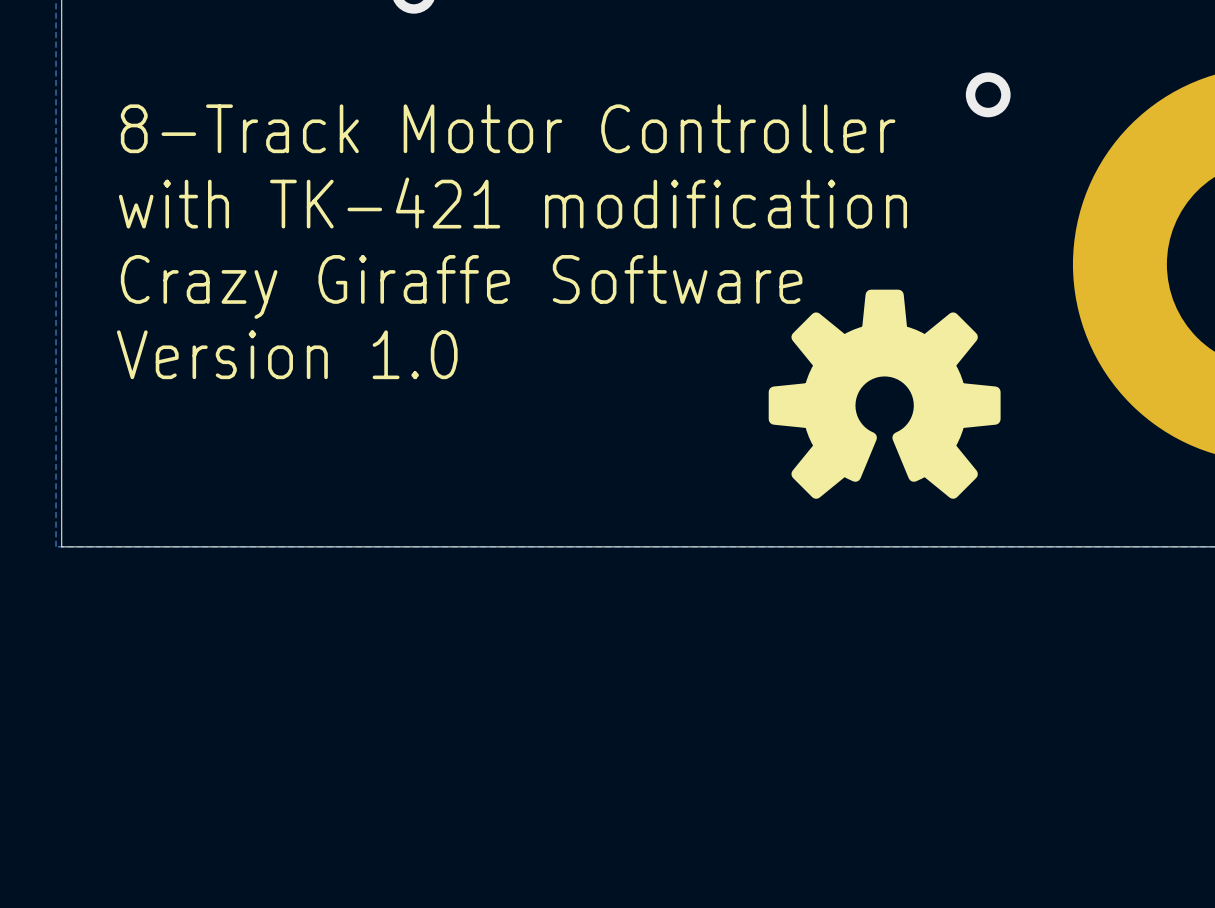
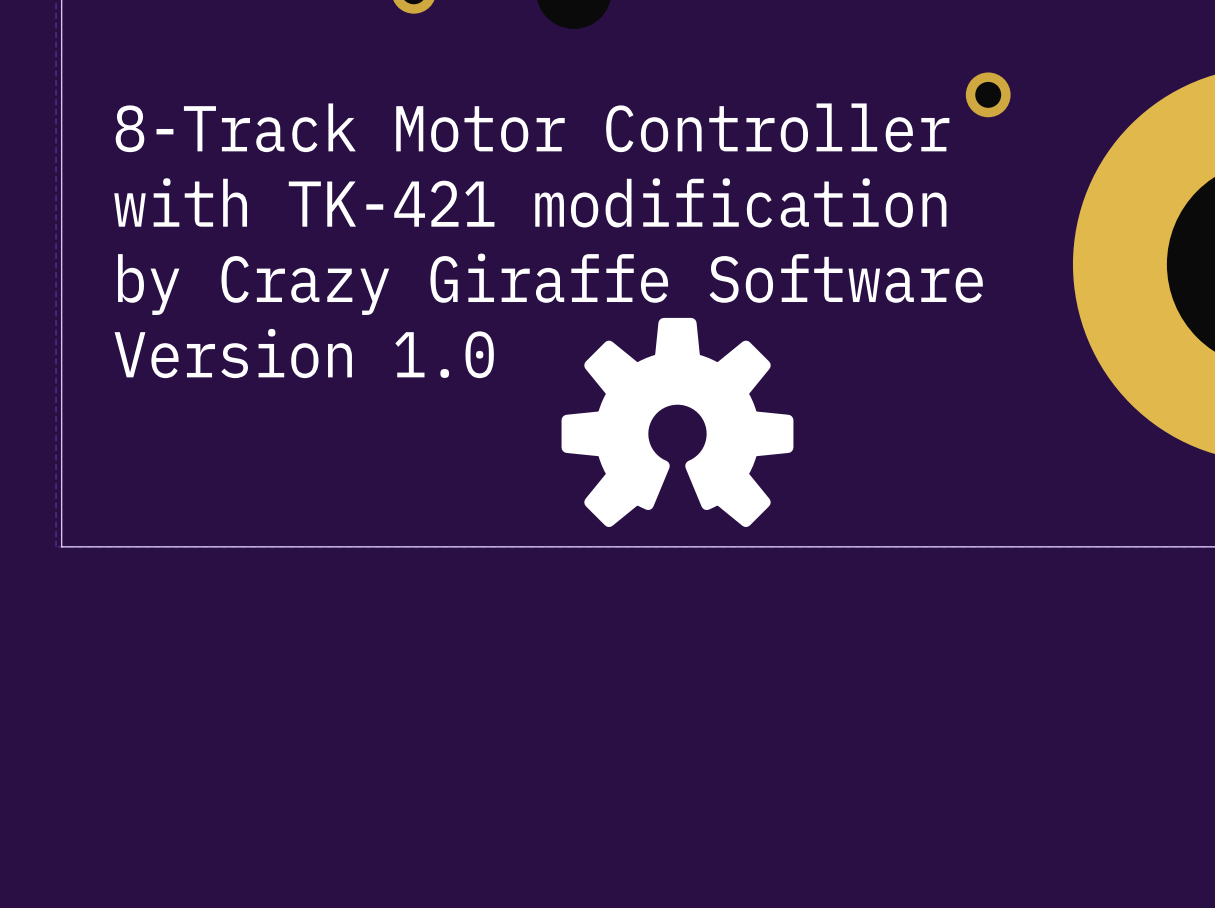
text: Crazy Giraffe Software (461, 286) -> by Crazy Giraffe Software (550, 284)
drawing position: (884, 394) -> (677, 422)

